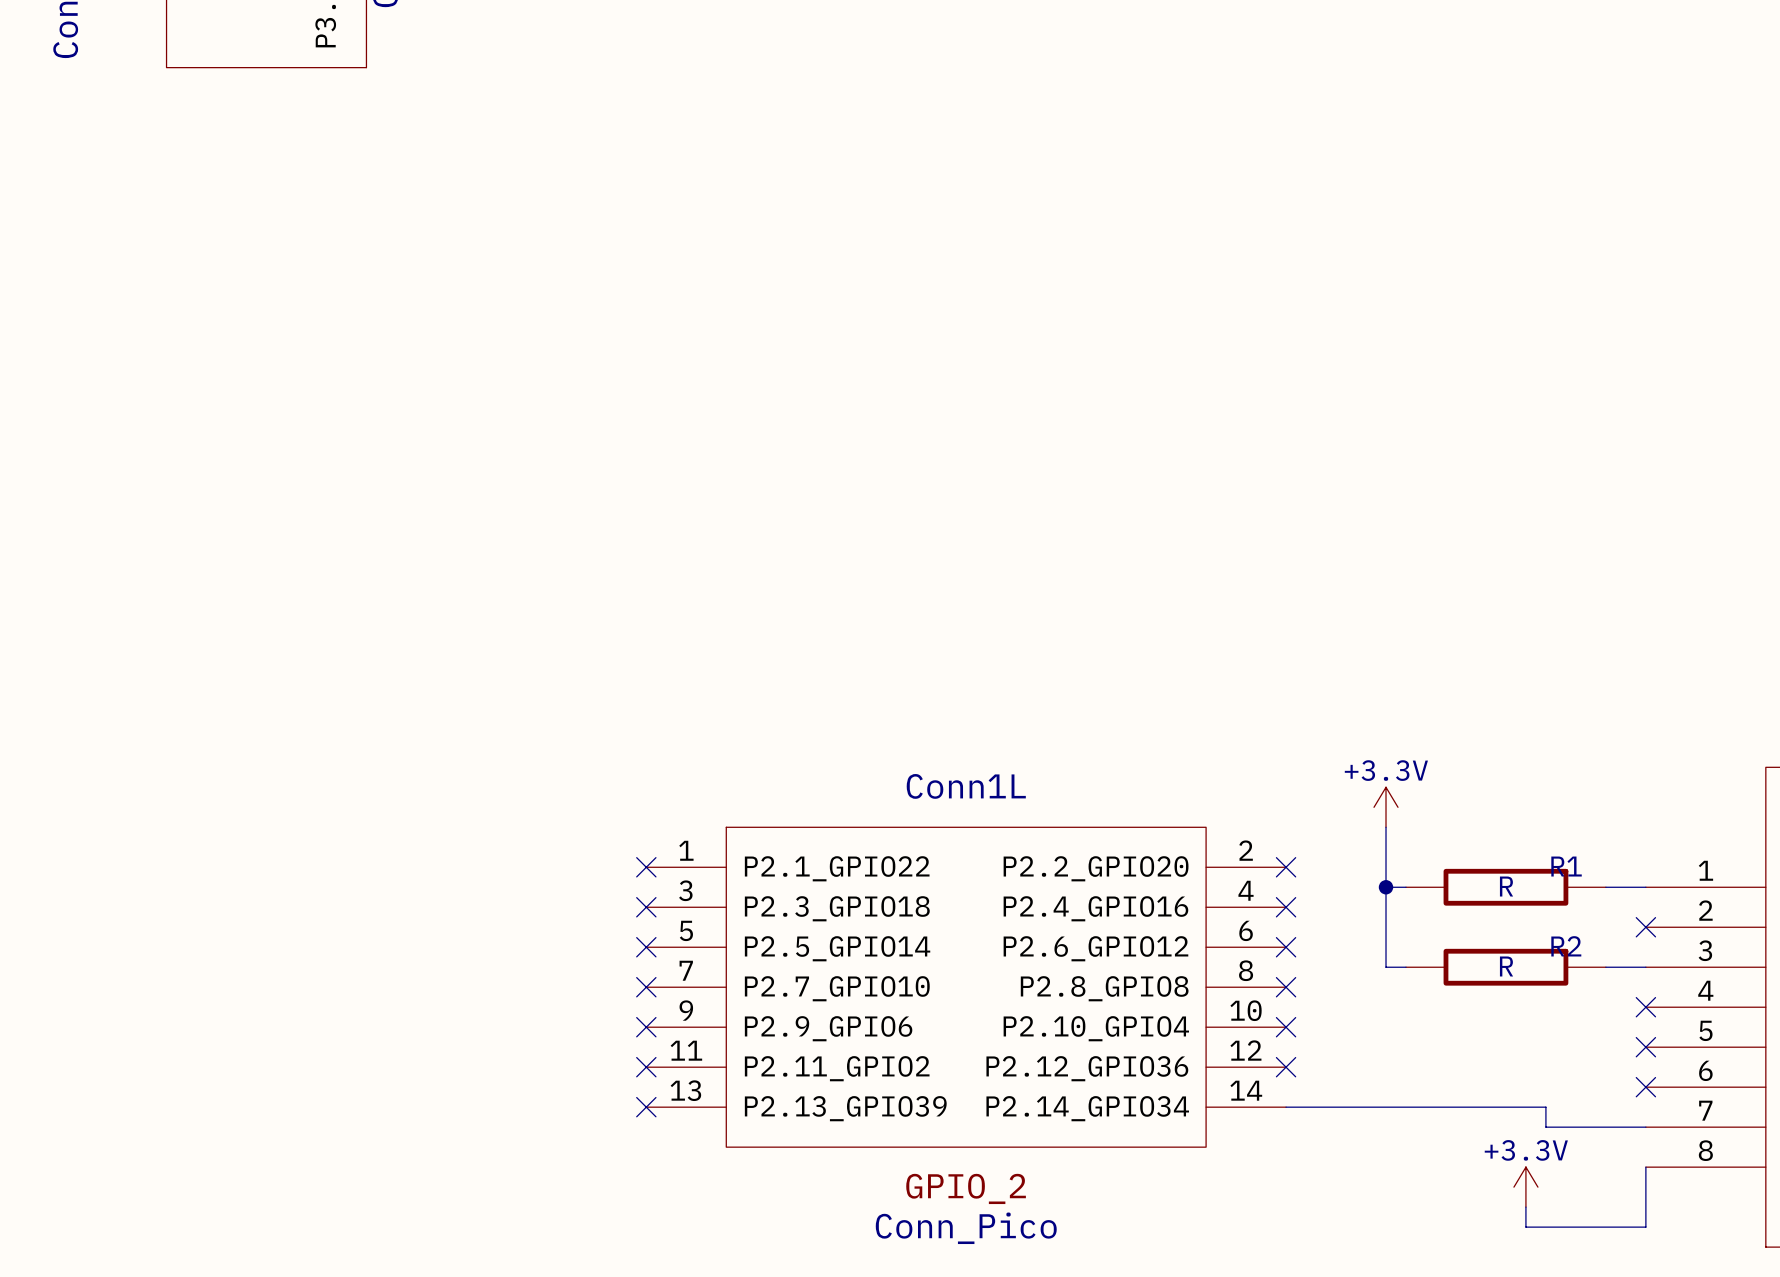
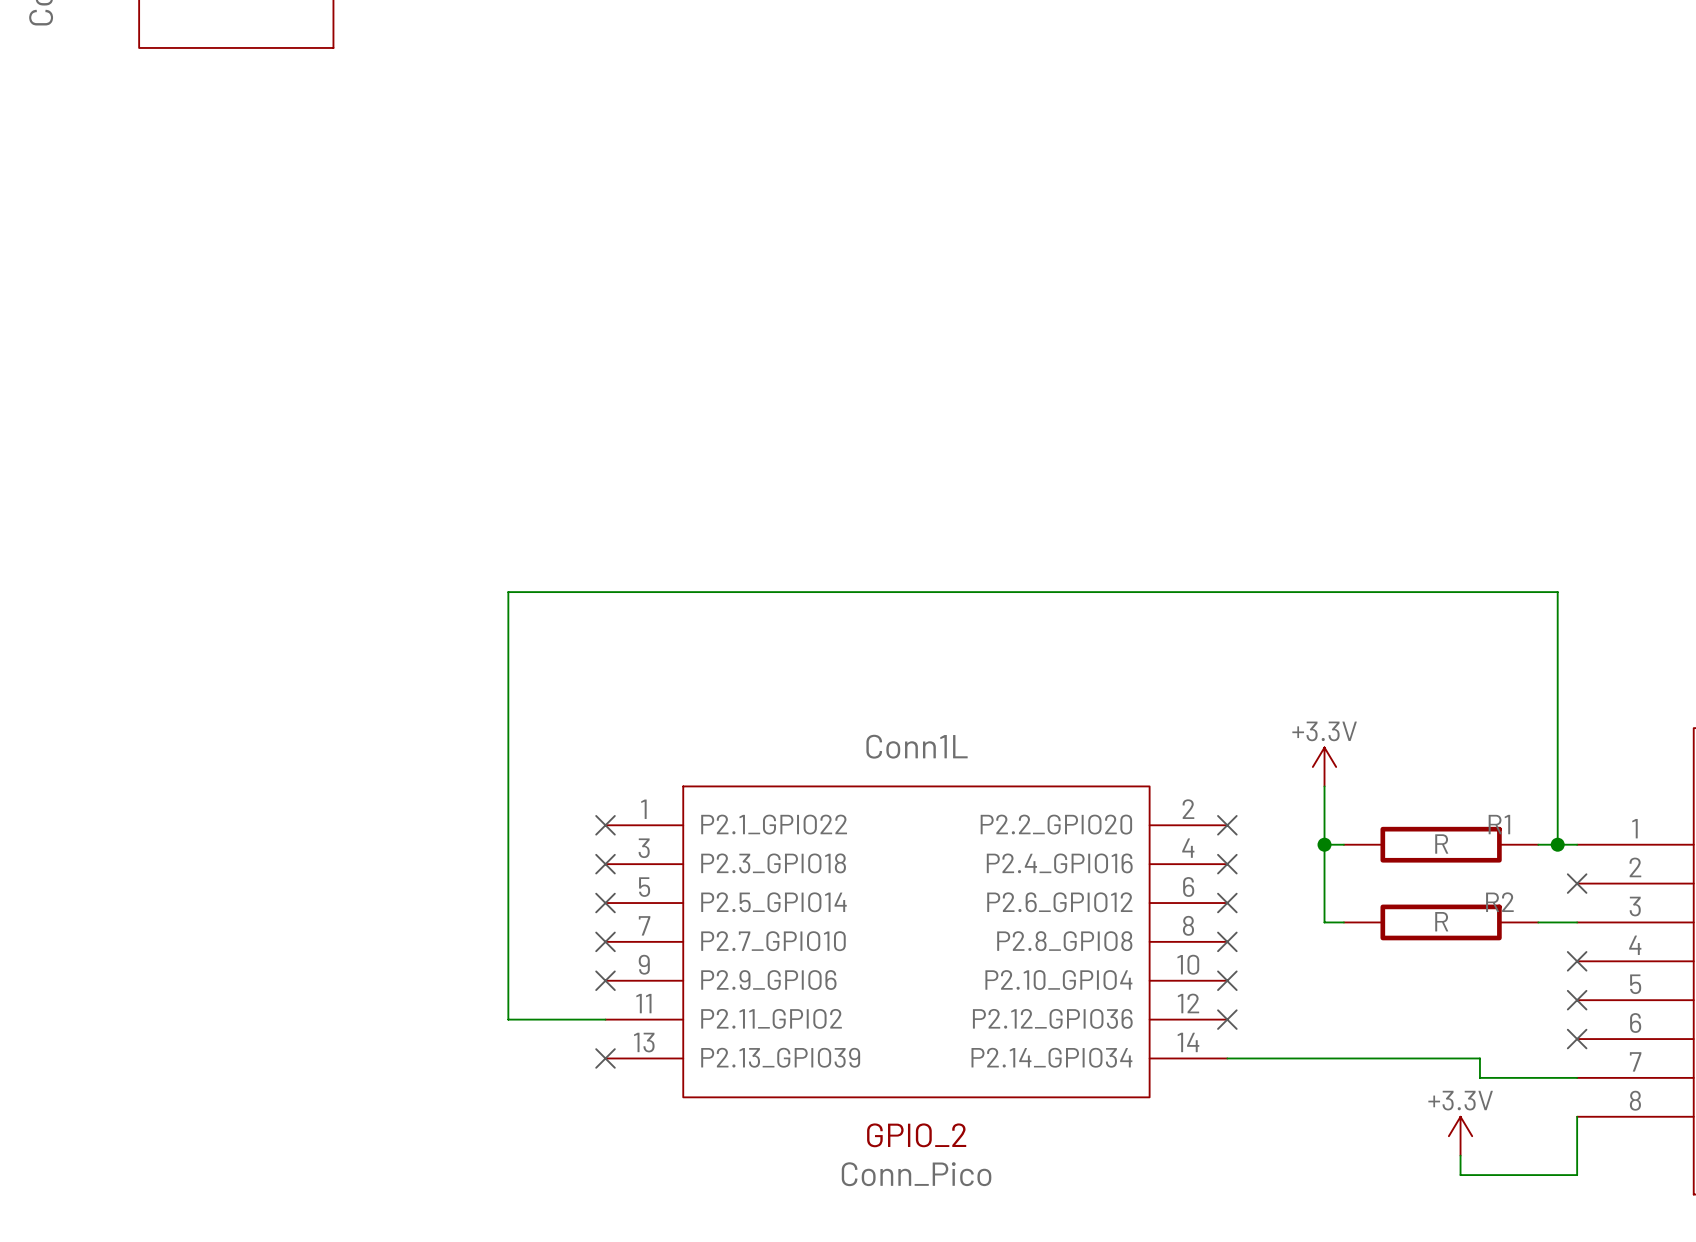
wire: none -> (1557, 844) (1557, 592) (508, 592) (508, 1019) (605, 1019)
junction: none -> (1557, 844)
no-connect mark: (646, 1067) -> none

